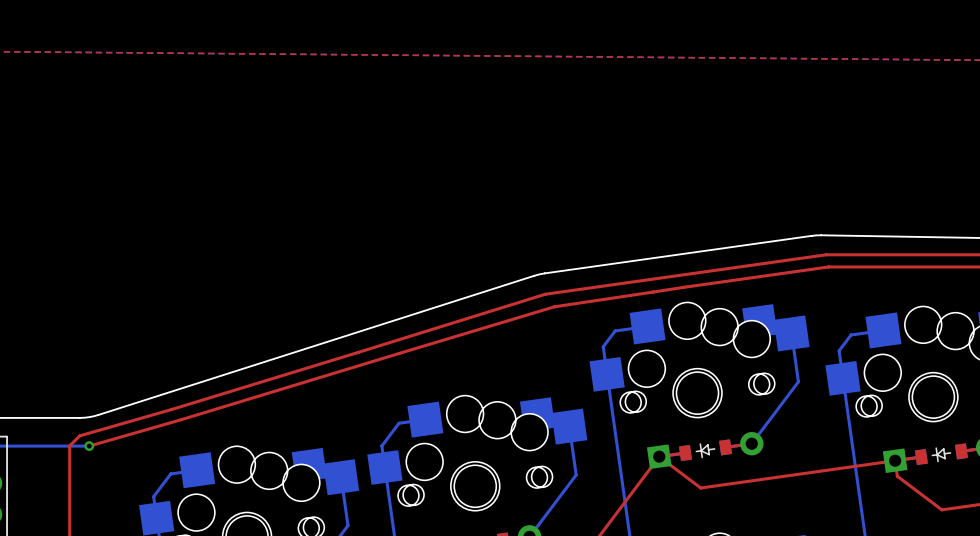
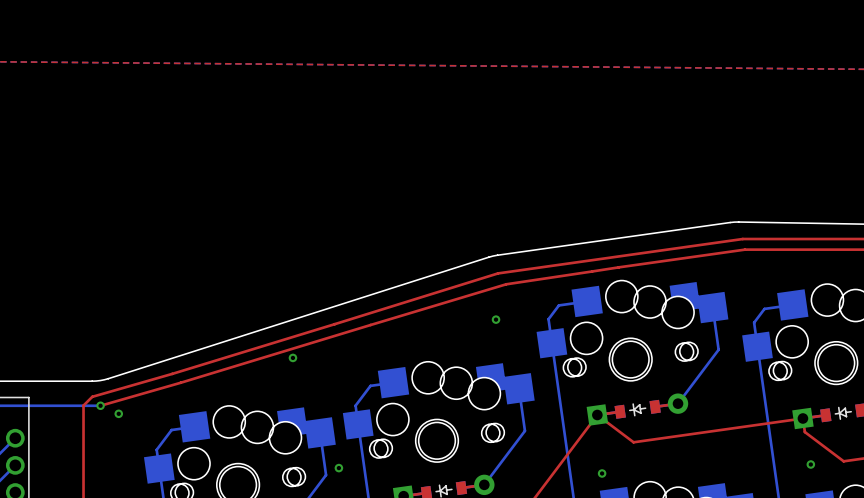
via: none -> (496, 319)
via: none -> (292, 357)
via: none -> (118, 413)
via: none -> (810, 464)
via: none -> (338, 468)
via: none -> (602, 473)

